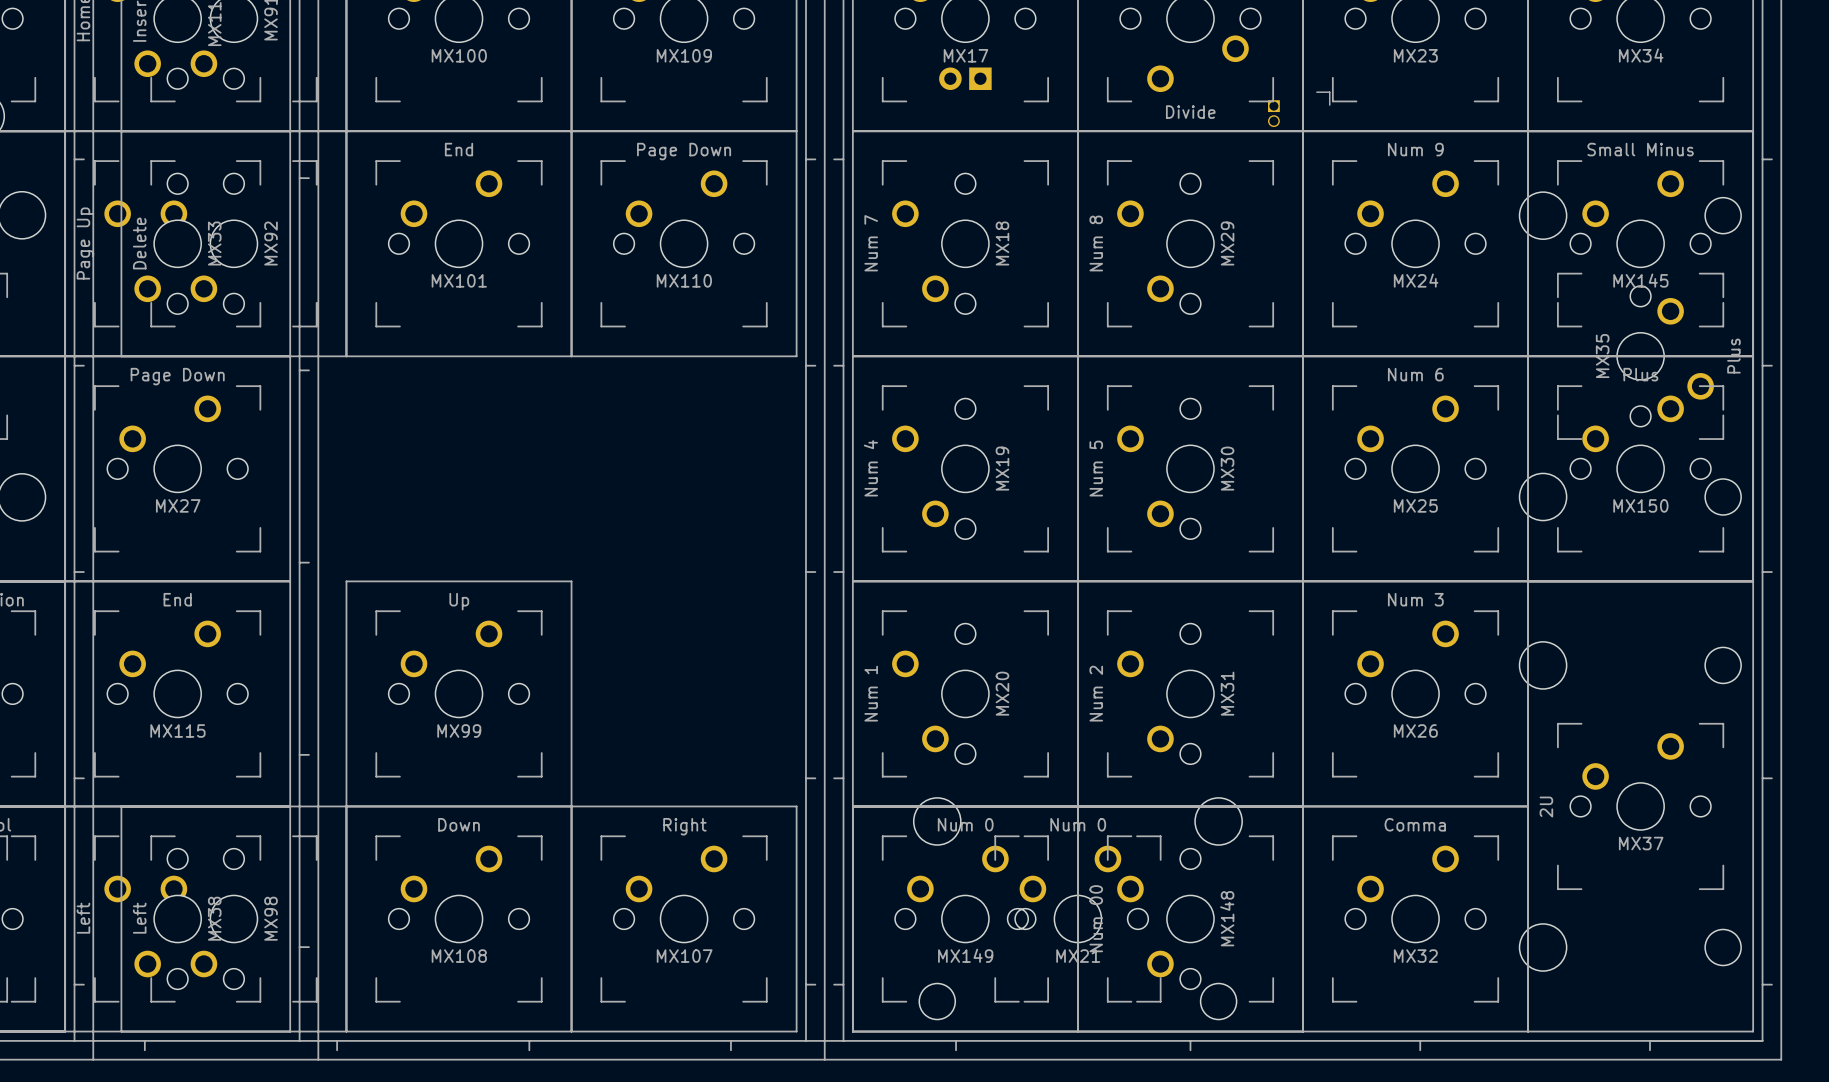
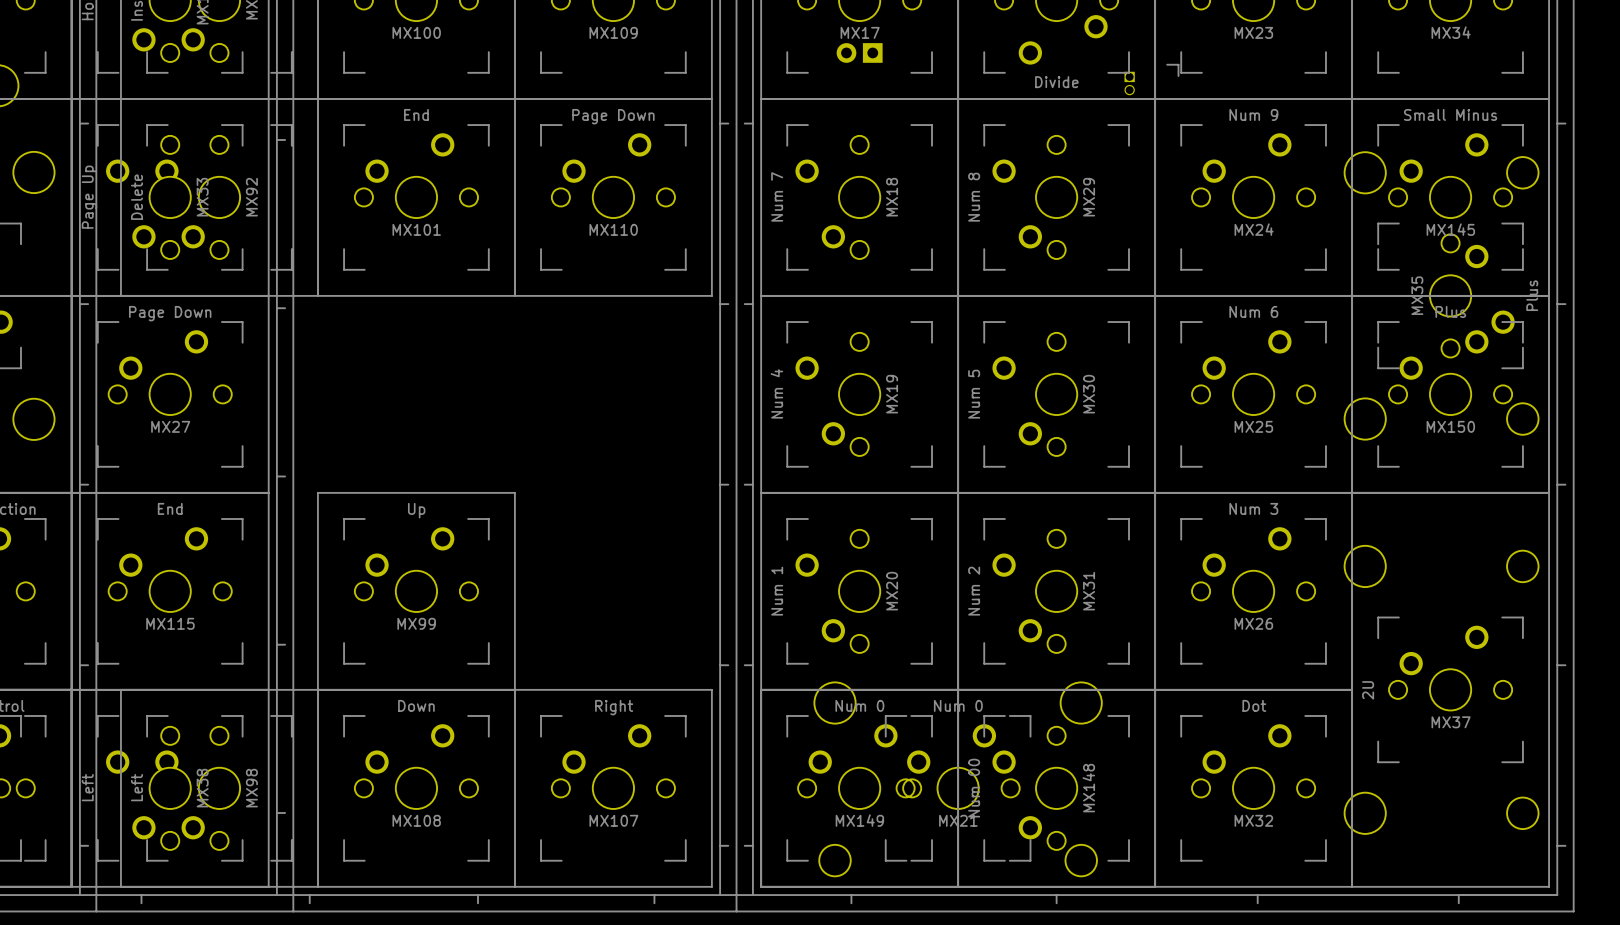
MX32 value: Comma (1415, 824) -> Dot (1254, 705)

